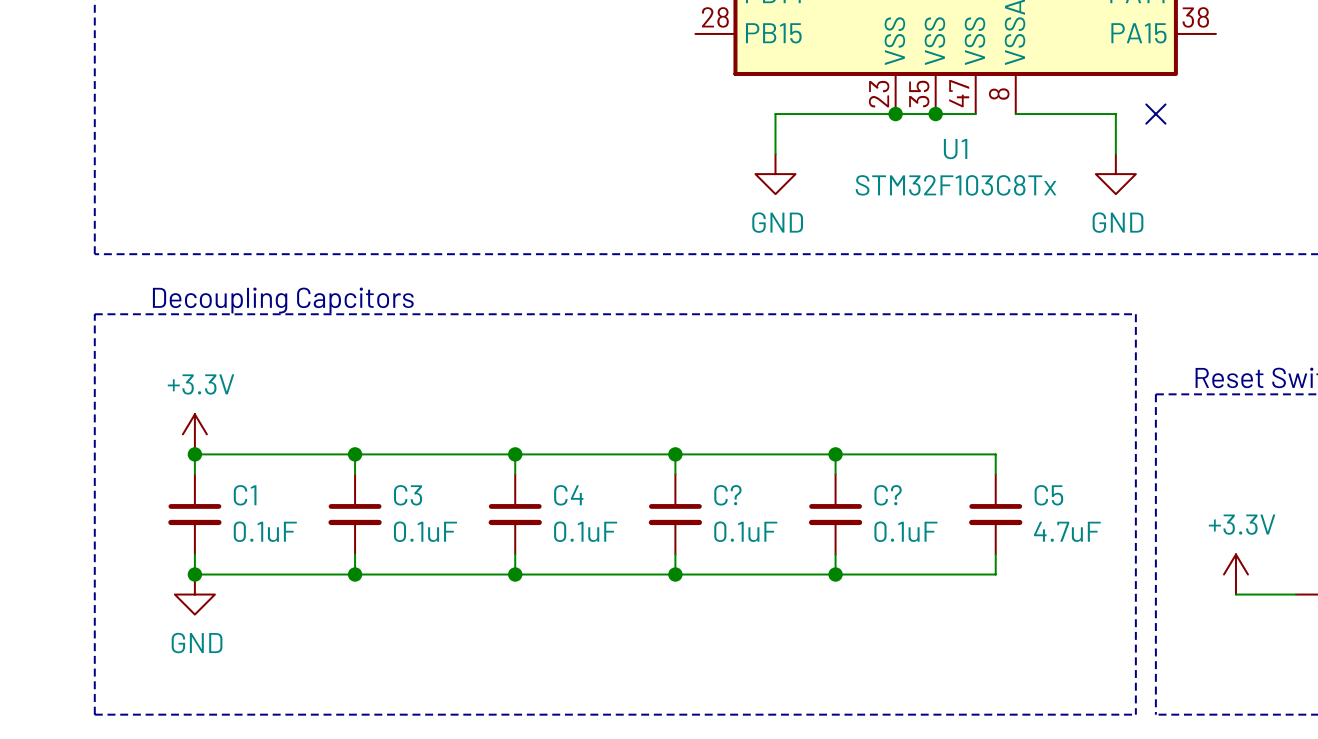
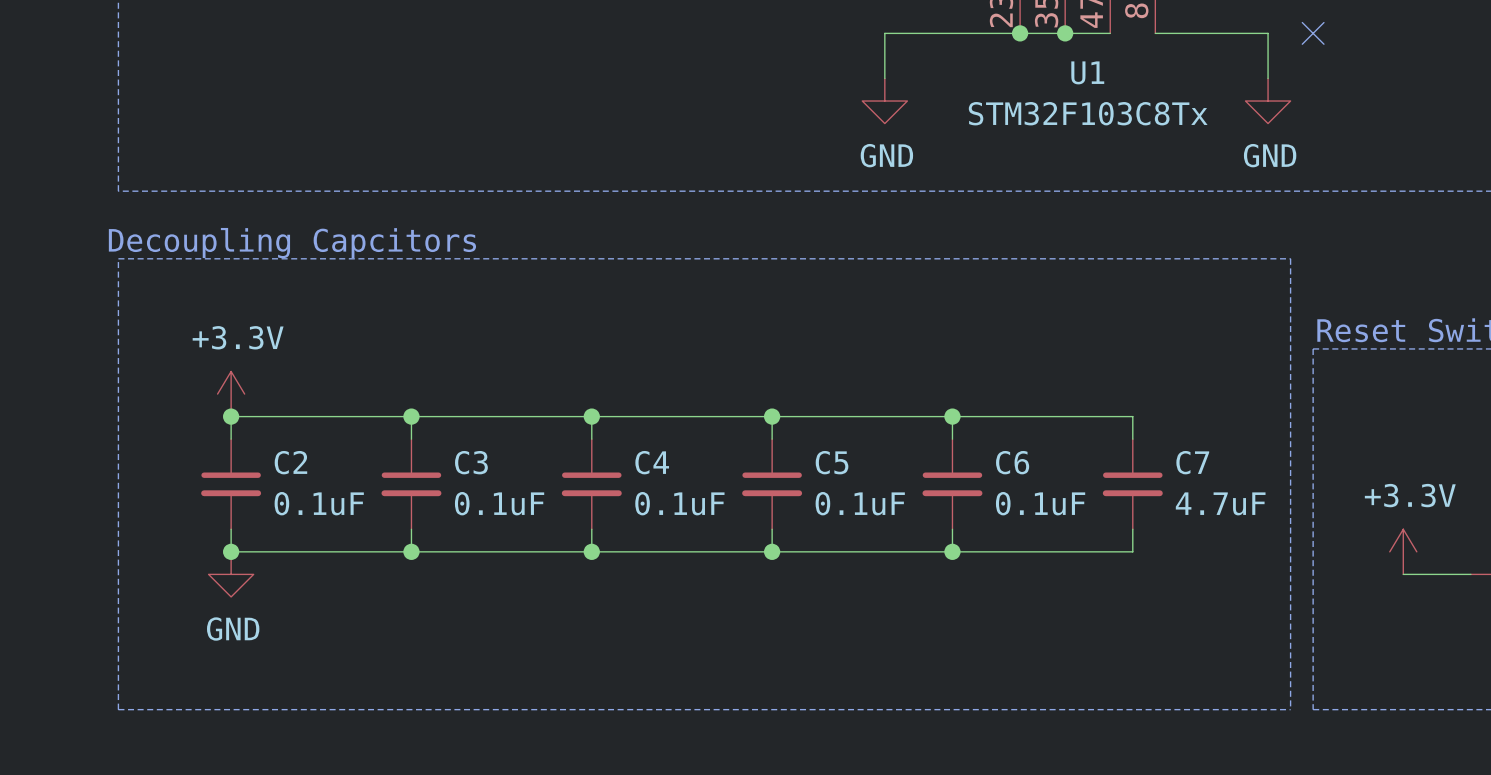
C1 name: C1 (245, 495) -> C2 (290, 462)
C? name: C? (727, 495) -> C5 (832, 462)
C? name: C? (888, 495) -> C6 (1012, 462)
C5 name: C5 (1048, 495) -> C7 (1192, 462)

